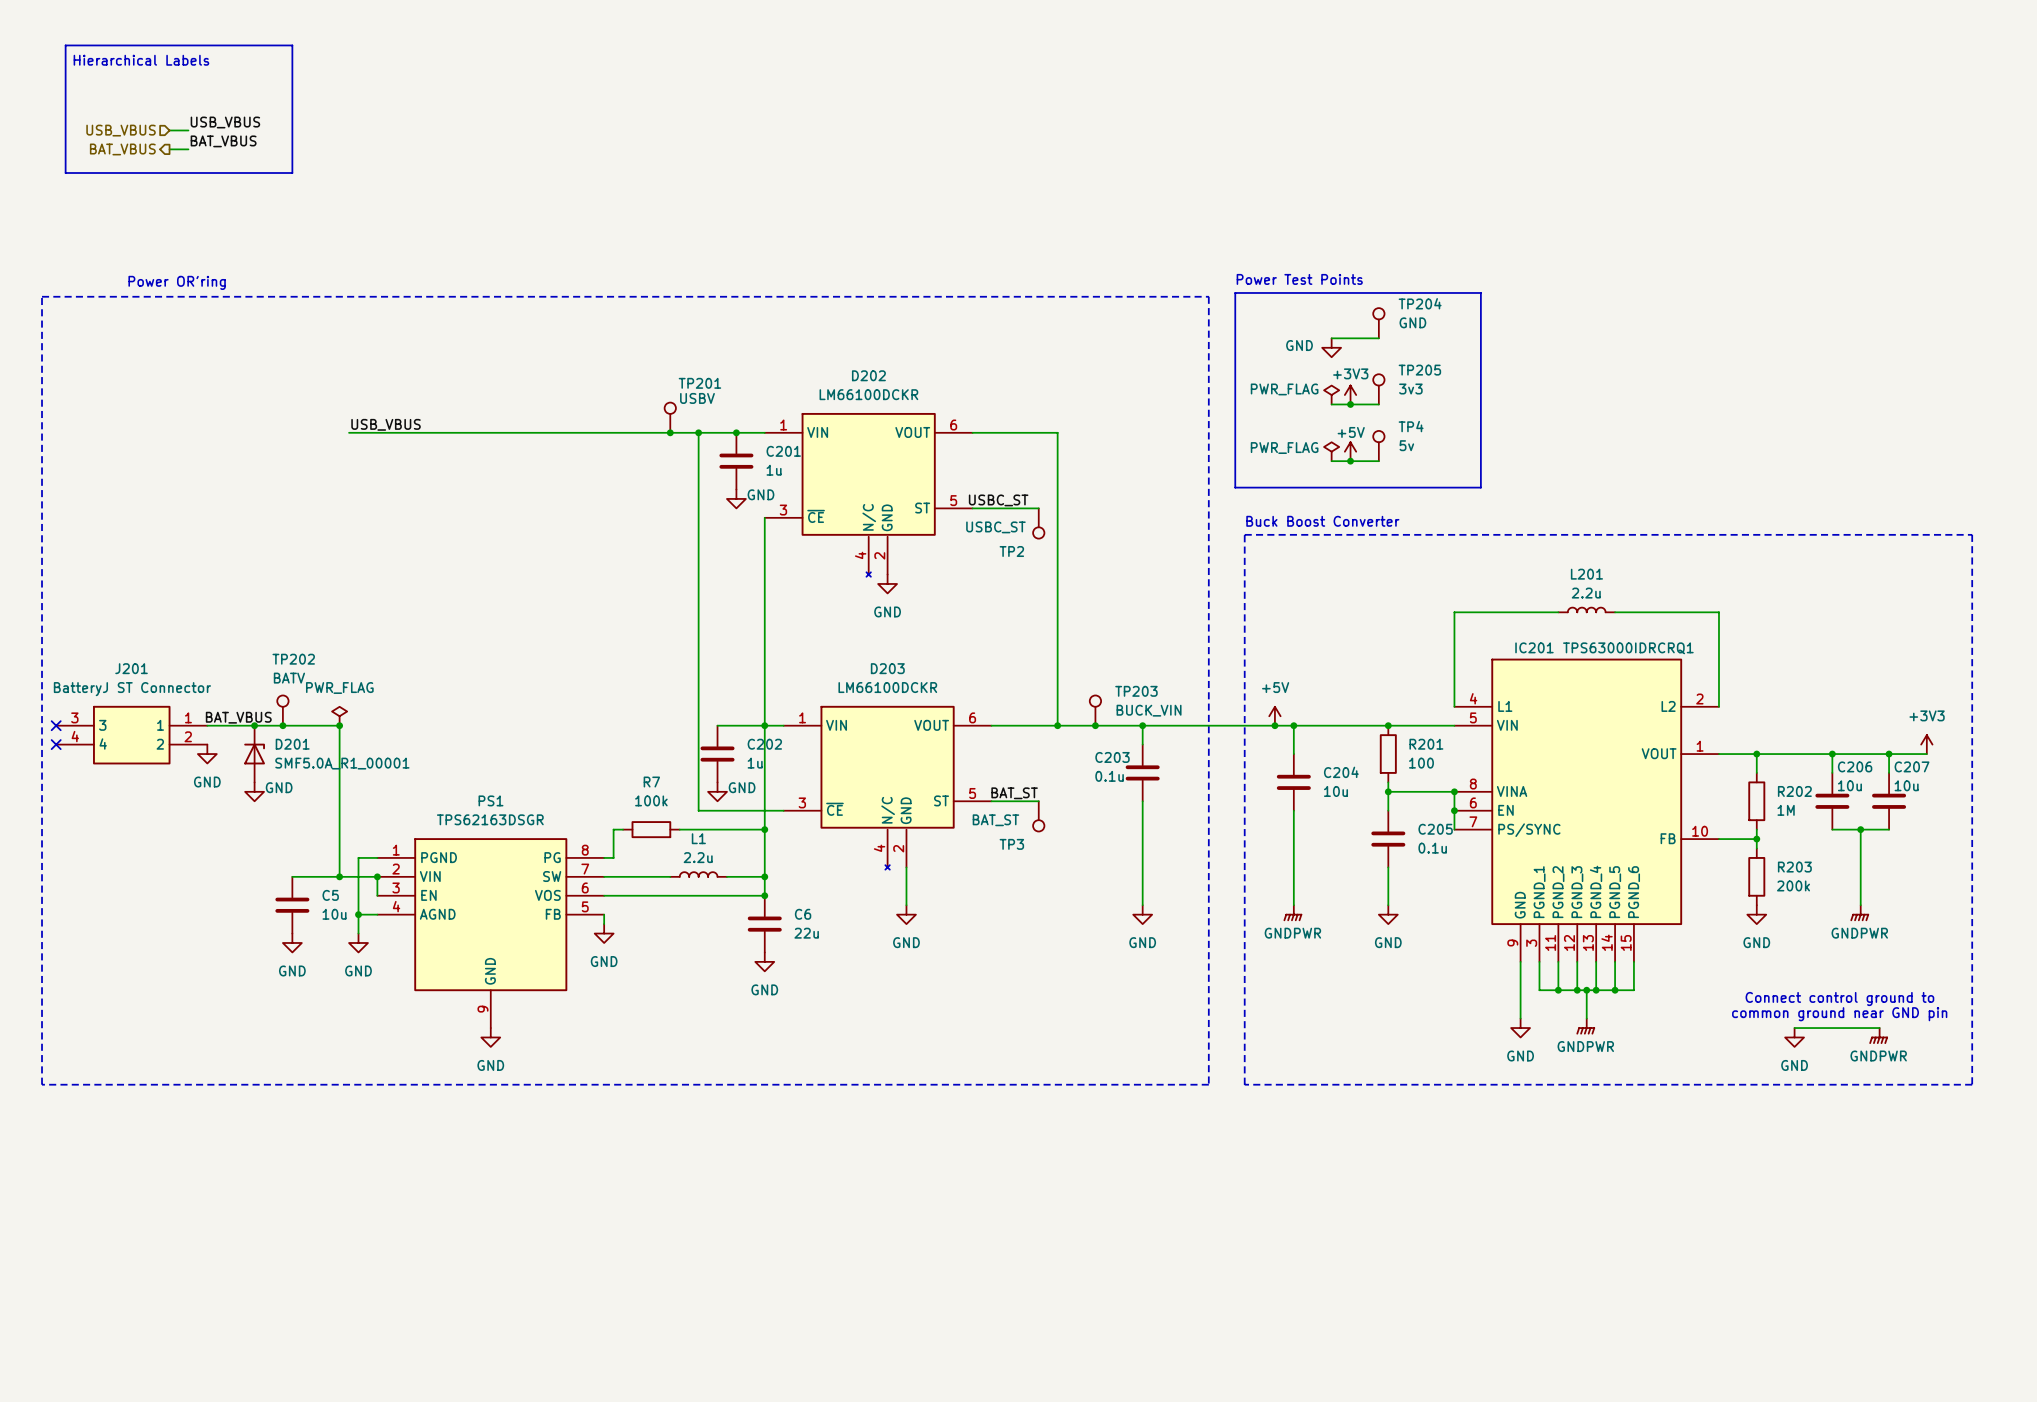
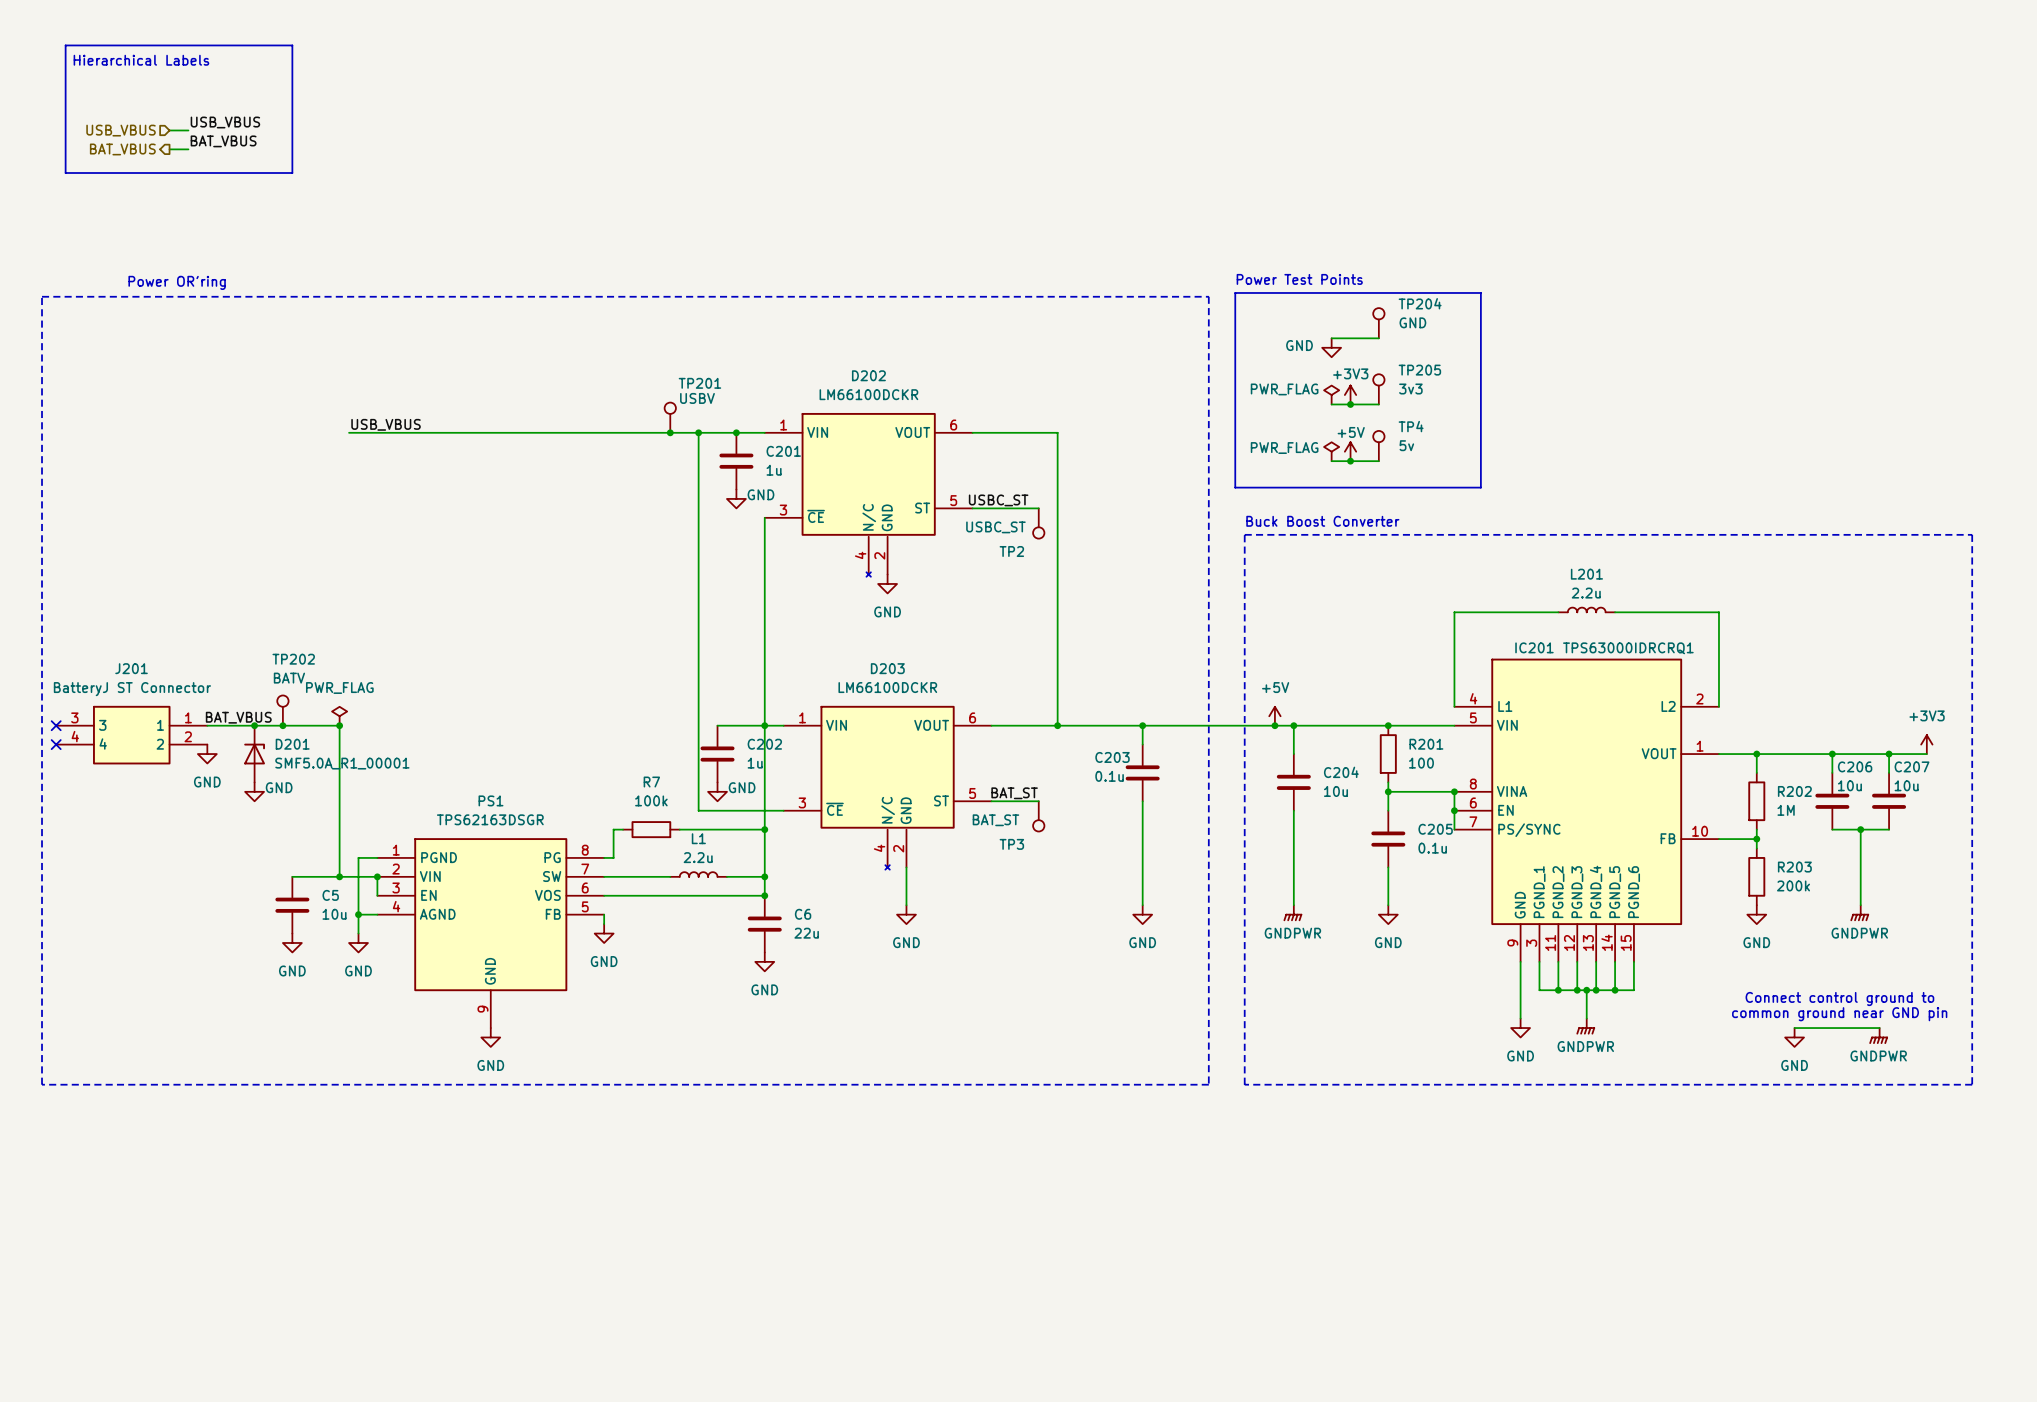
TP203: BUCK_VIN (1095, 710) -> none
junction: (1095, 725) -> none

